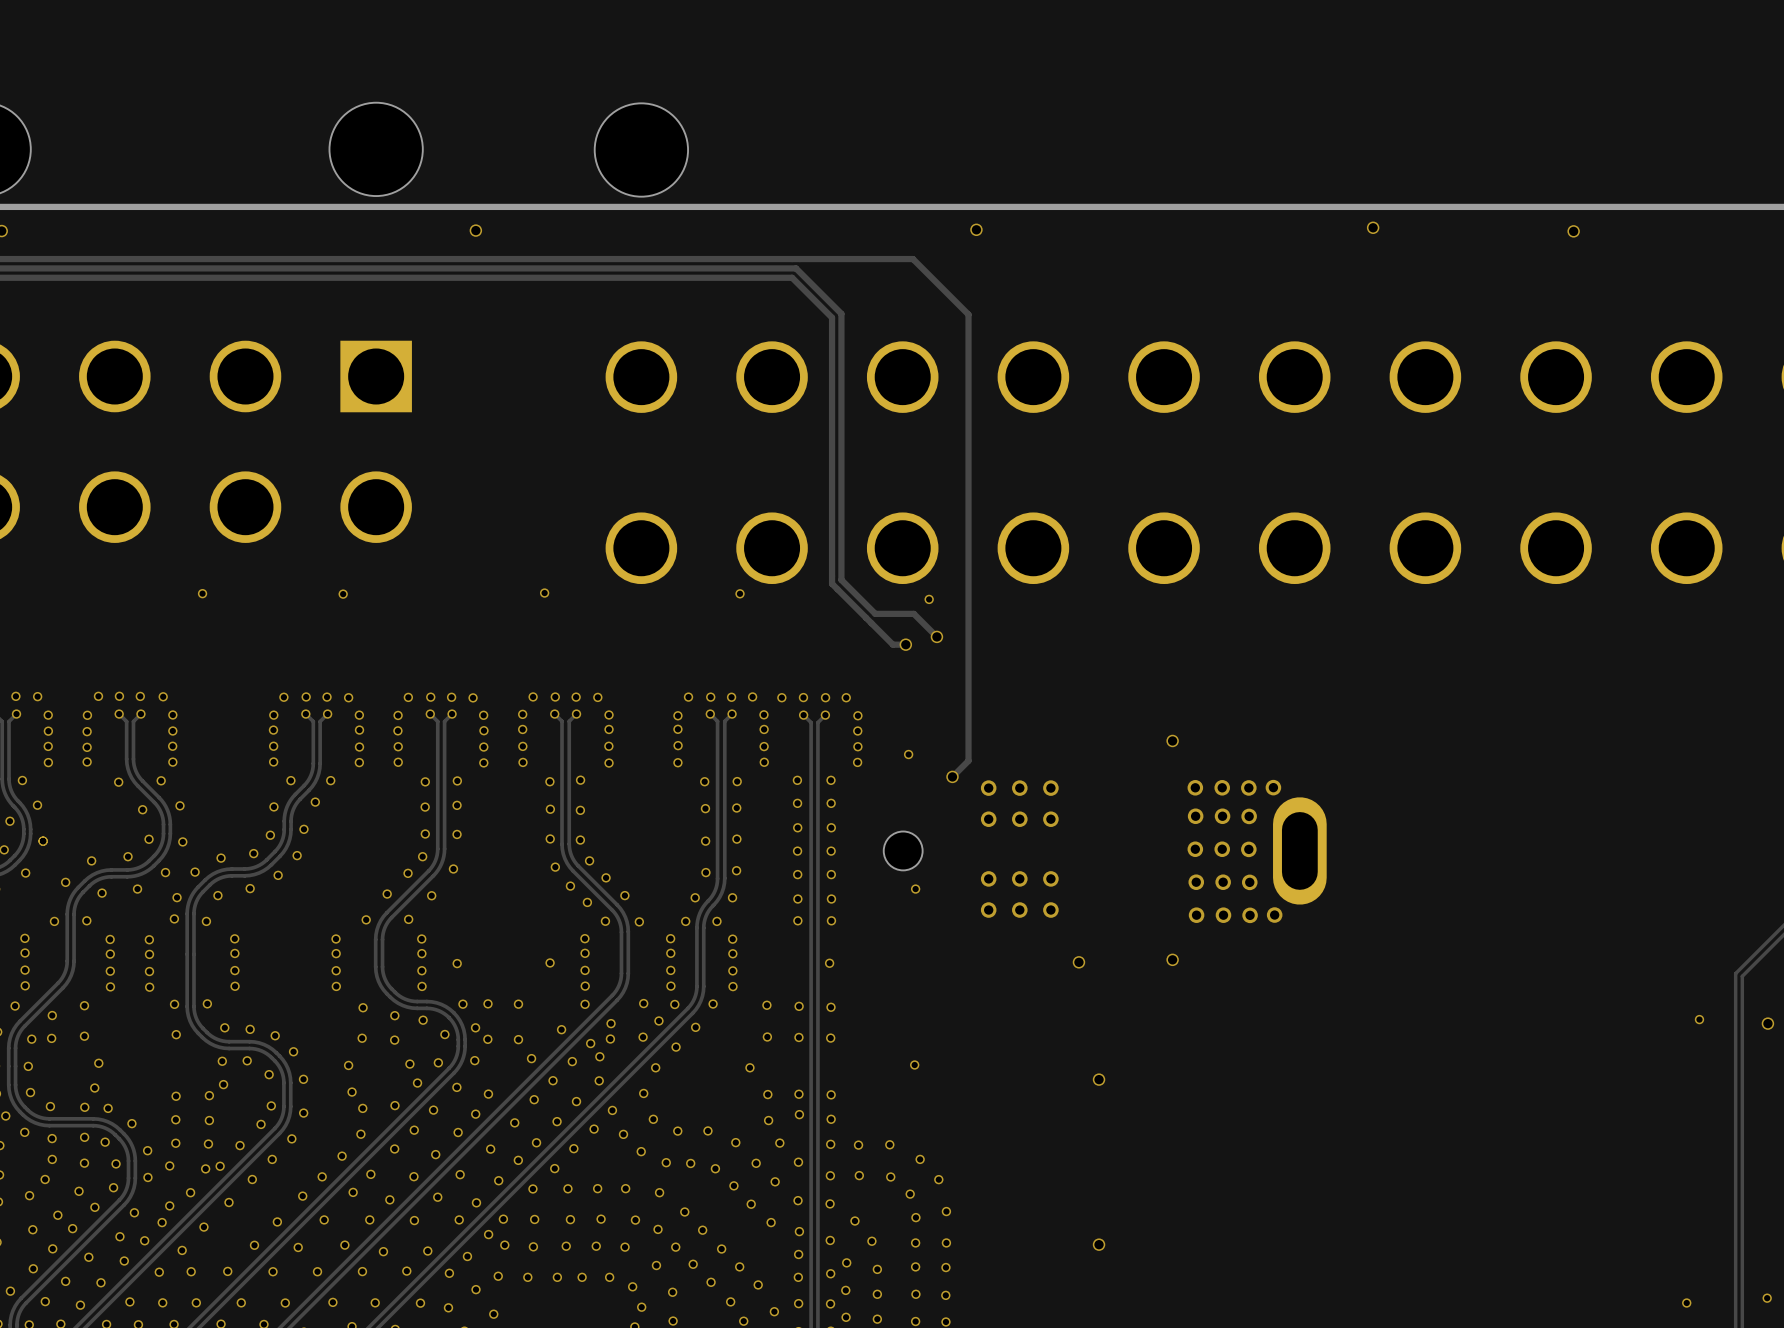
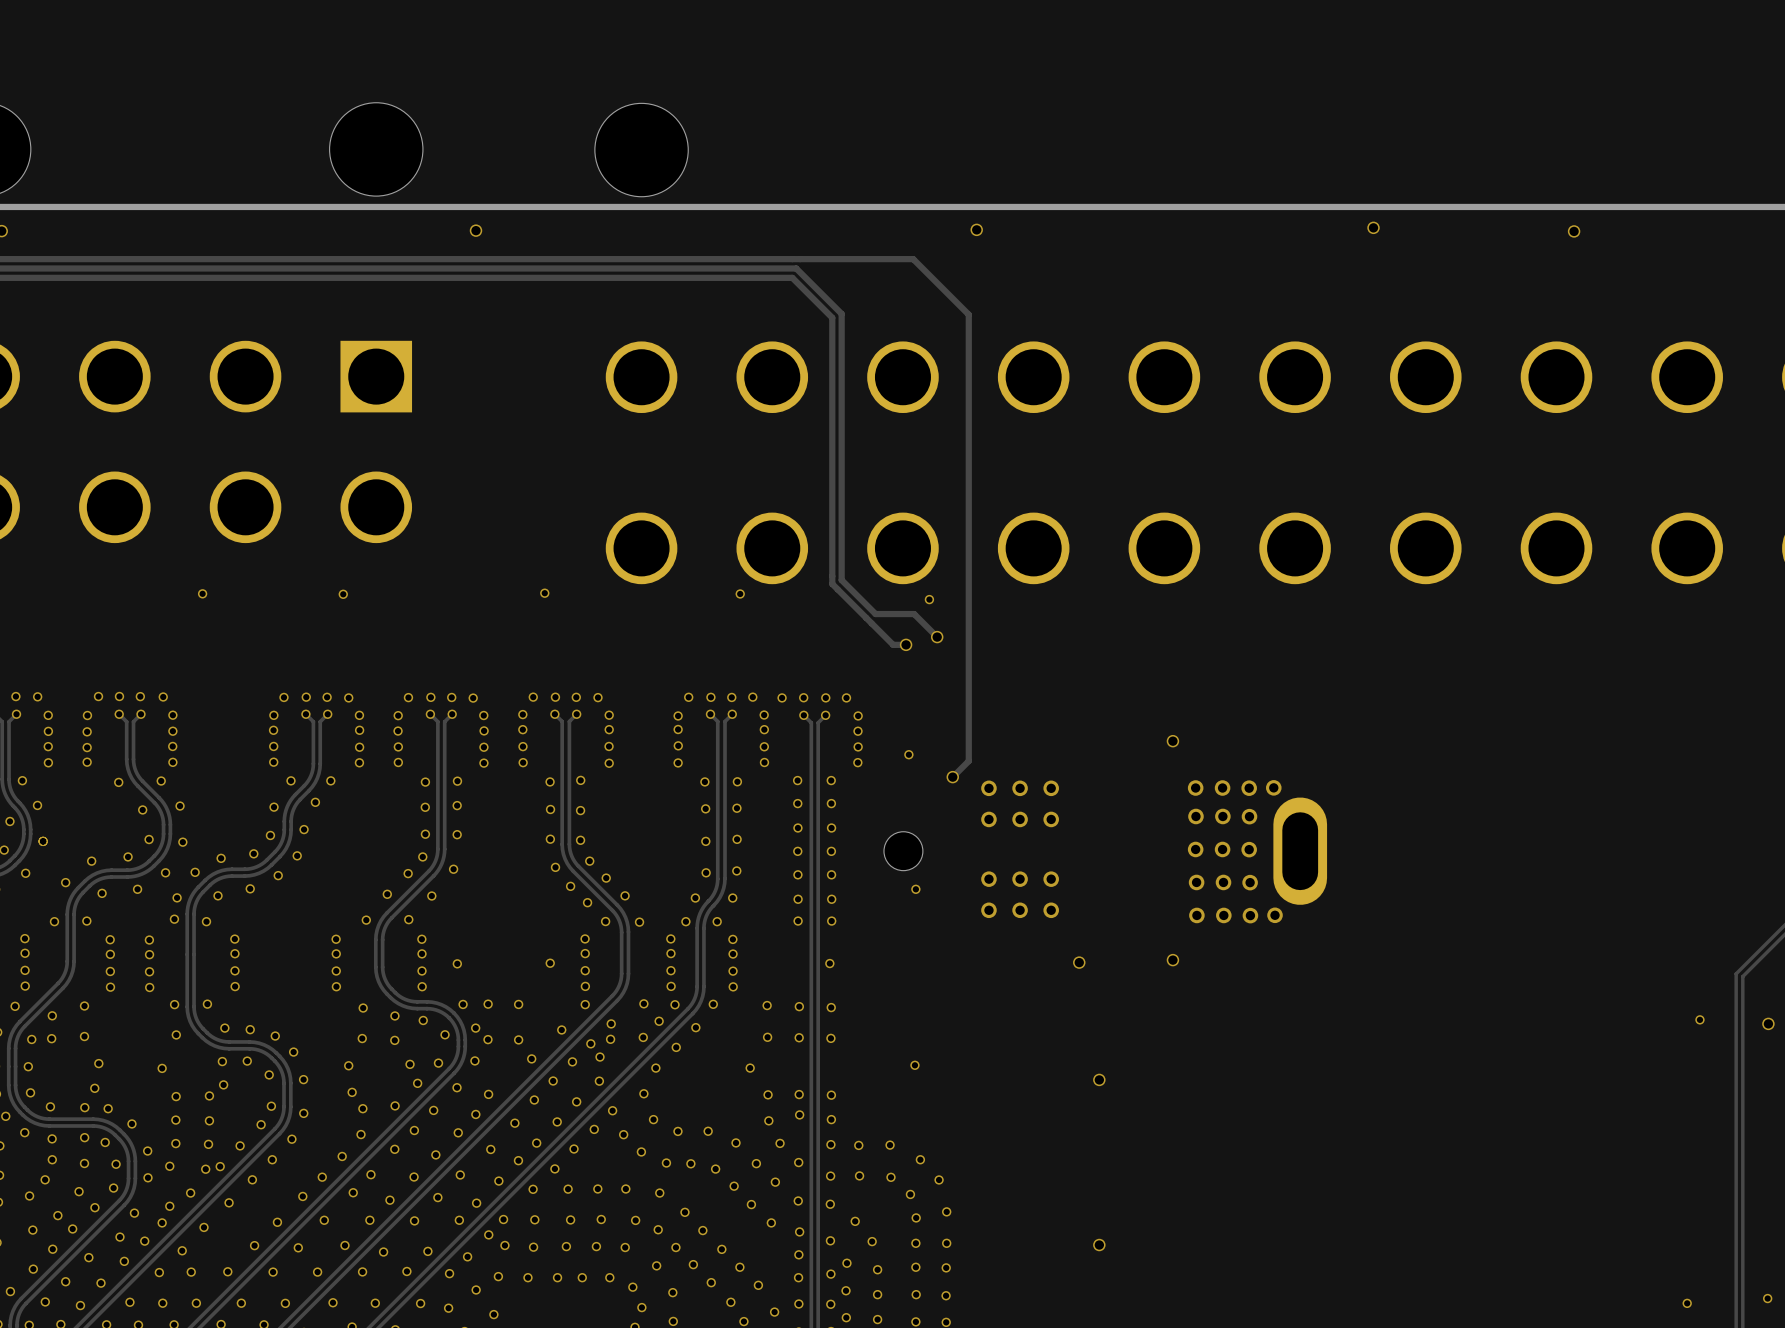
via: none -> (162, 1068)

